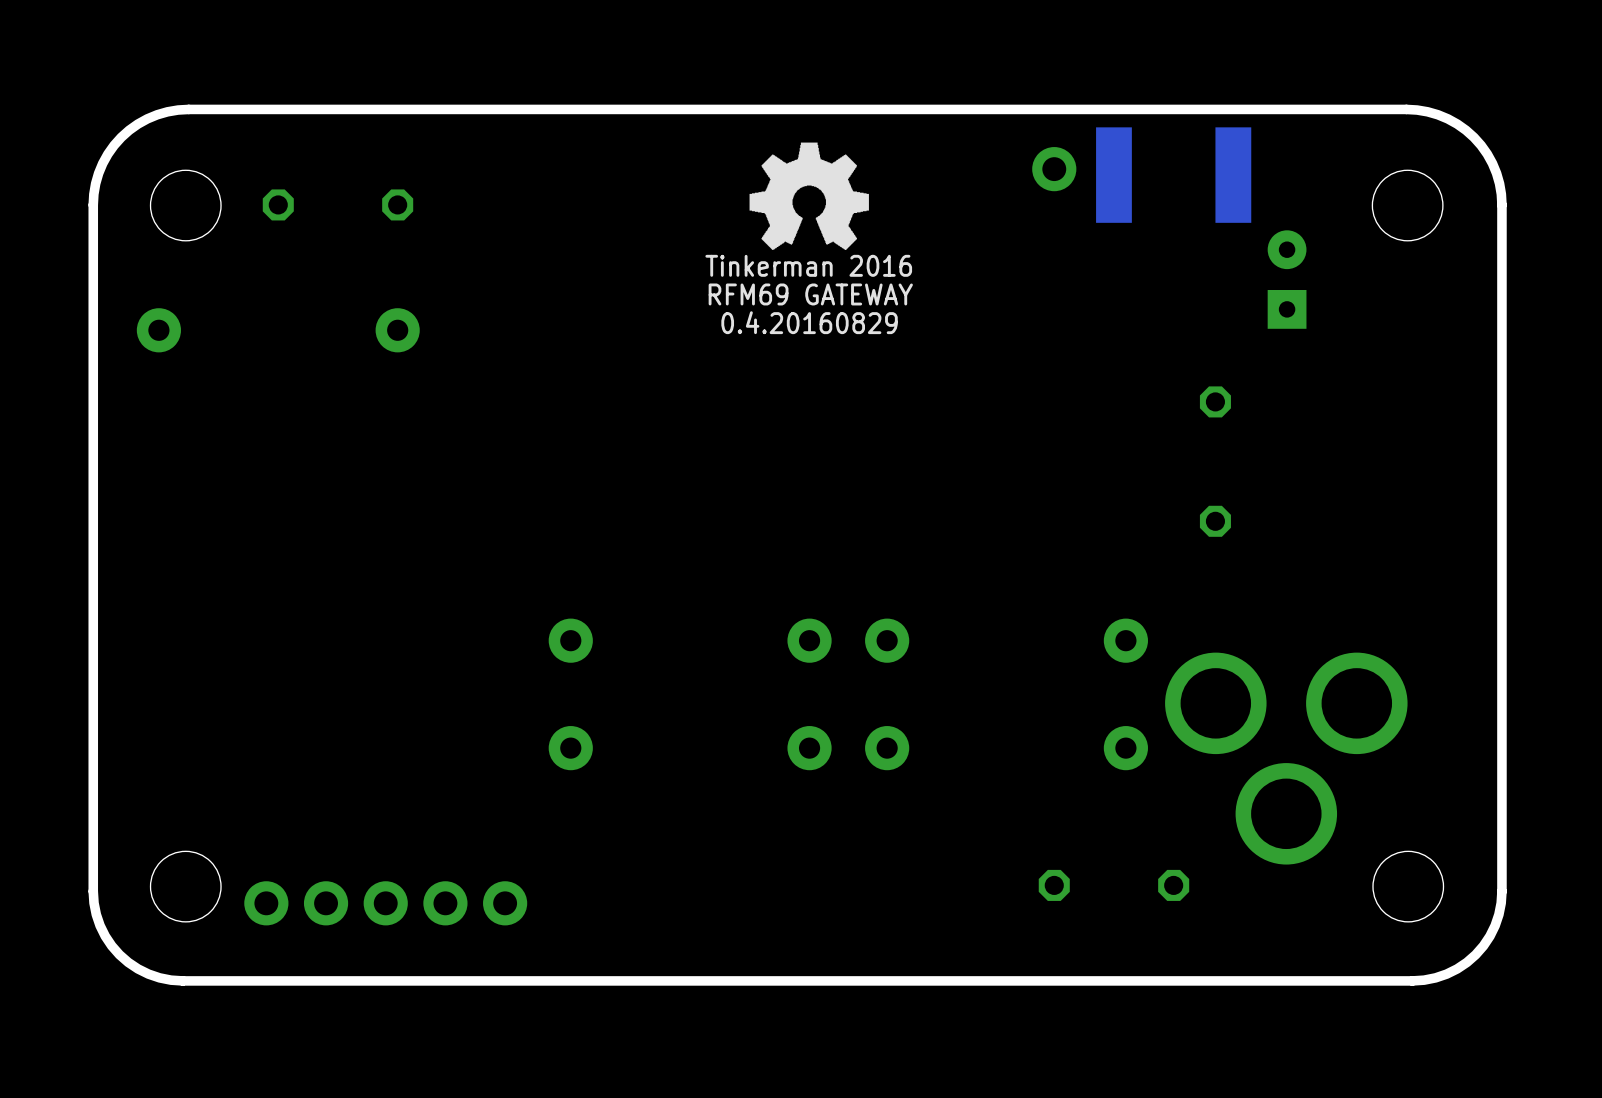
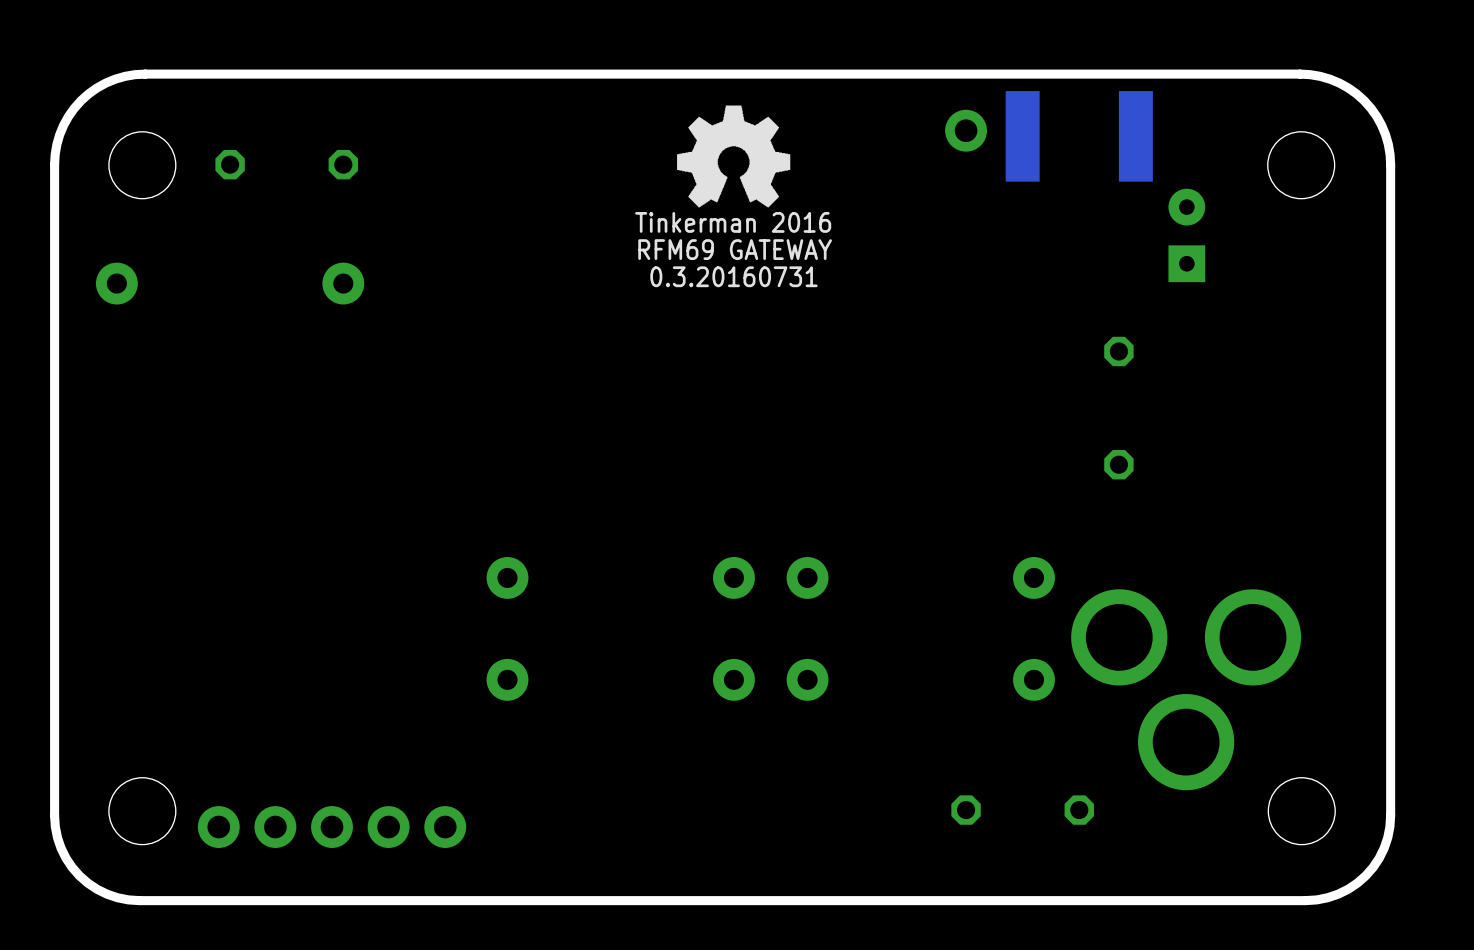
text: 0.4.20160829 (809, 322) -> 0.3.20160731 (733, 276)

